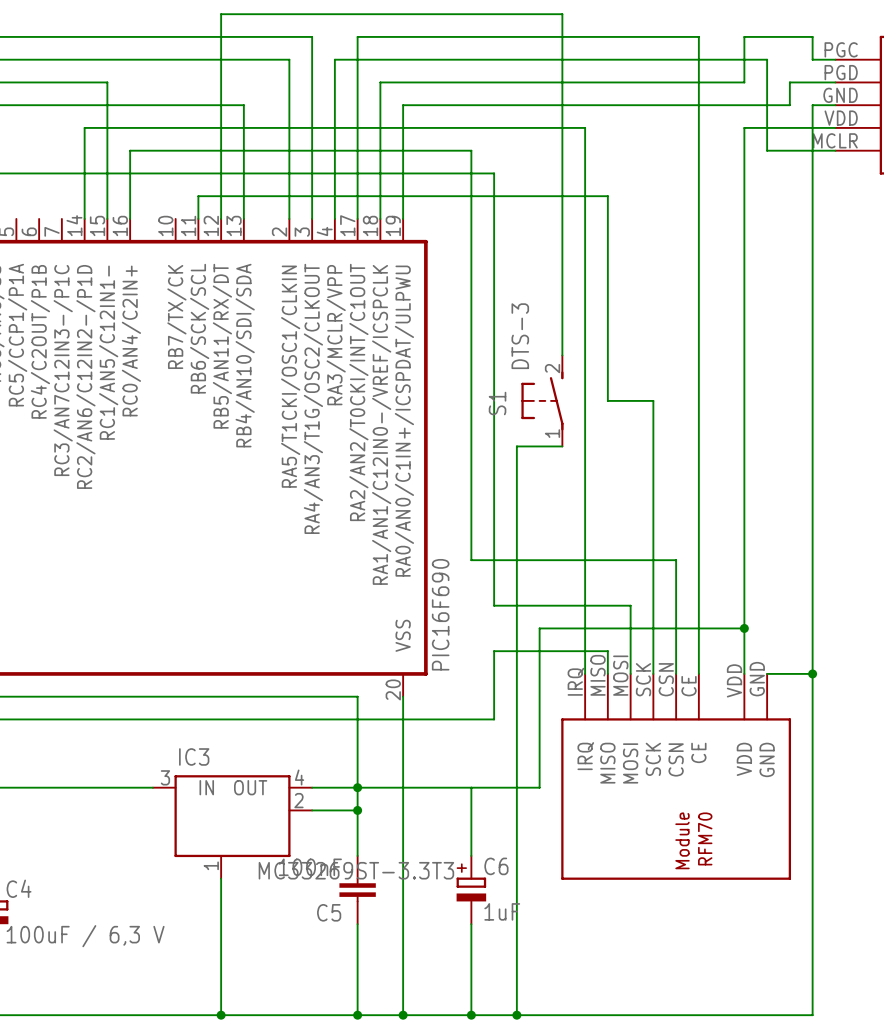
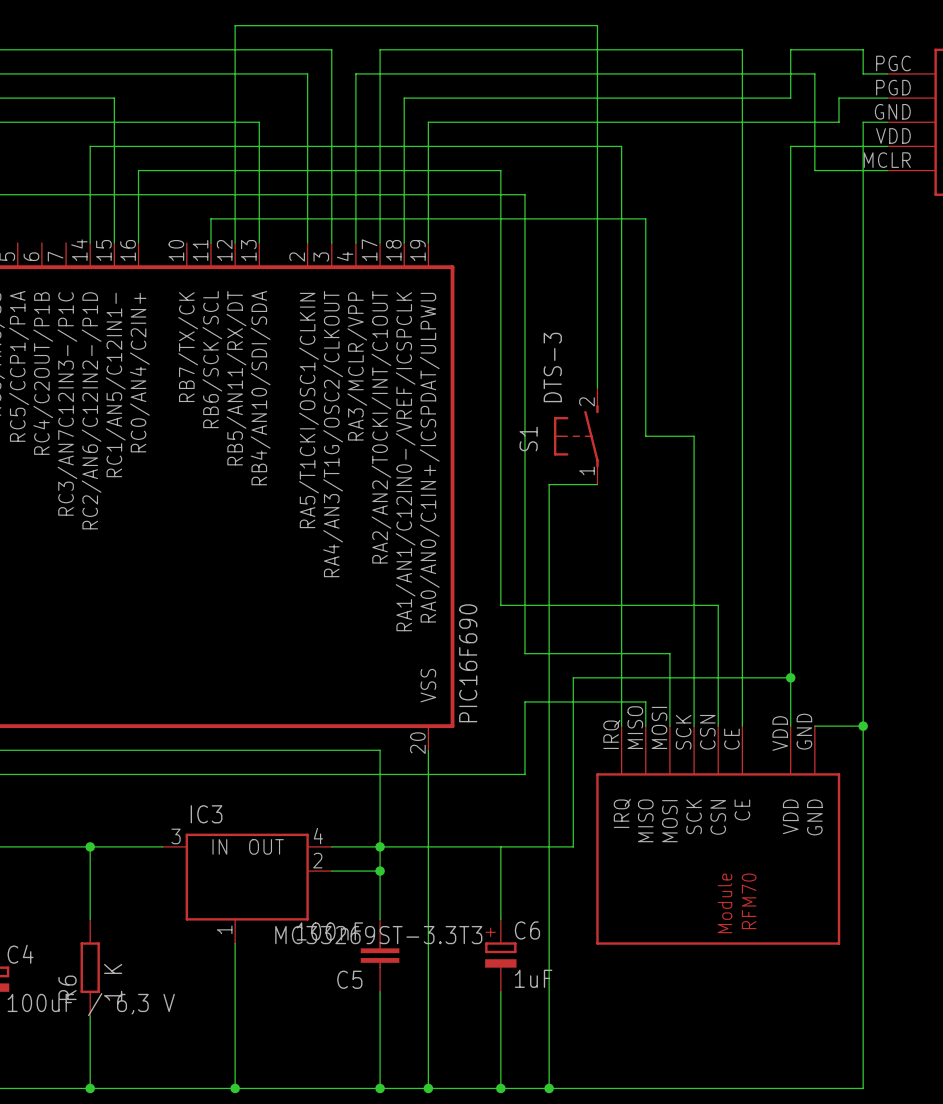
wire: none -> (90, 846) (90, 919)
junction: none -> (90, 846)
R6: none -> 1 K (90, 967)
wire: none -> (90, 1015) (90, 1088)
junction: none -> (90, 1088)

